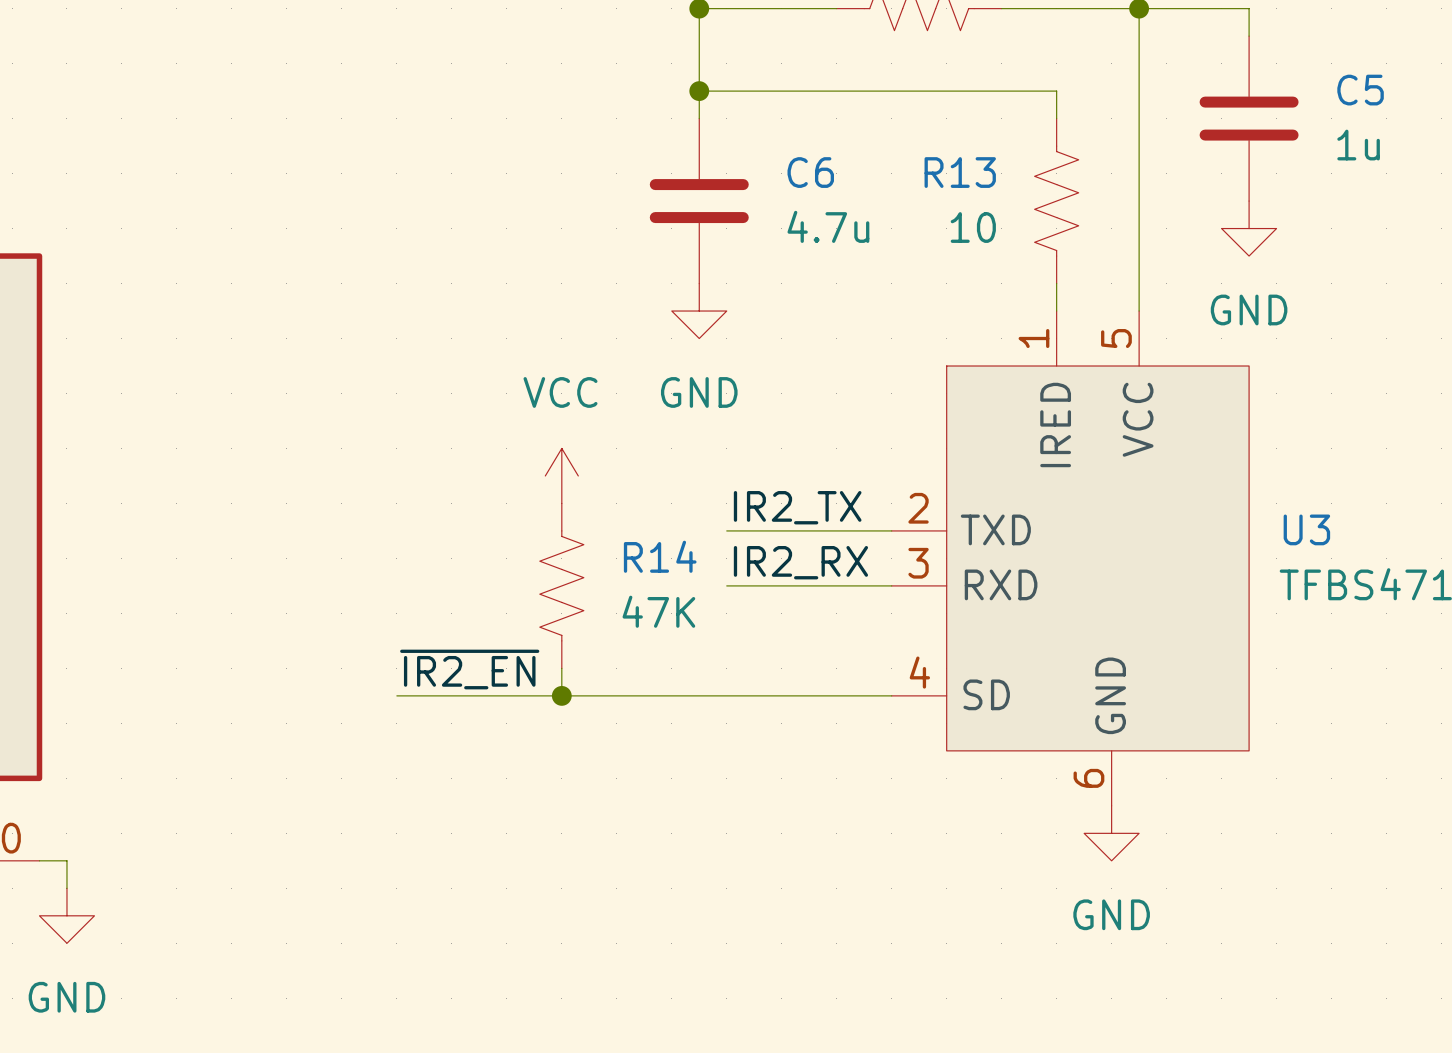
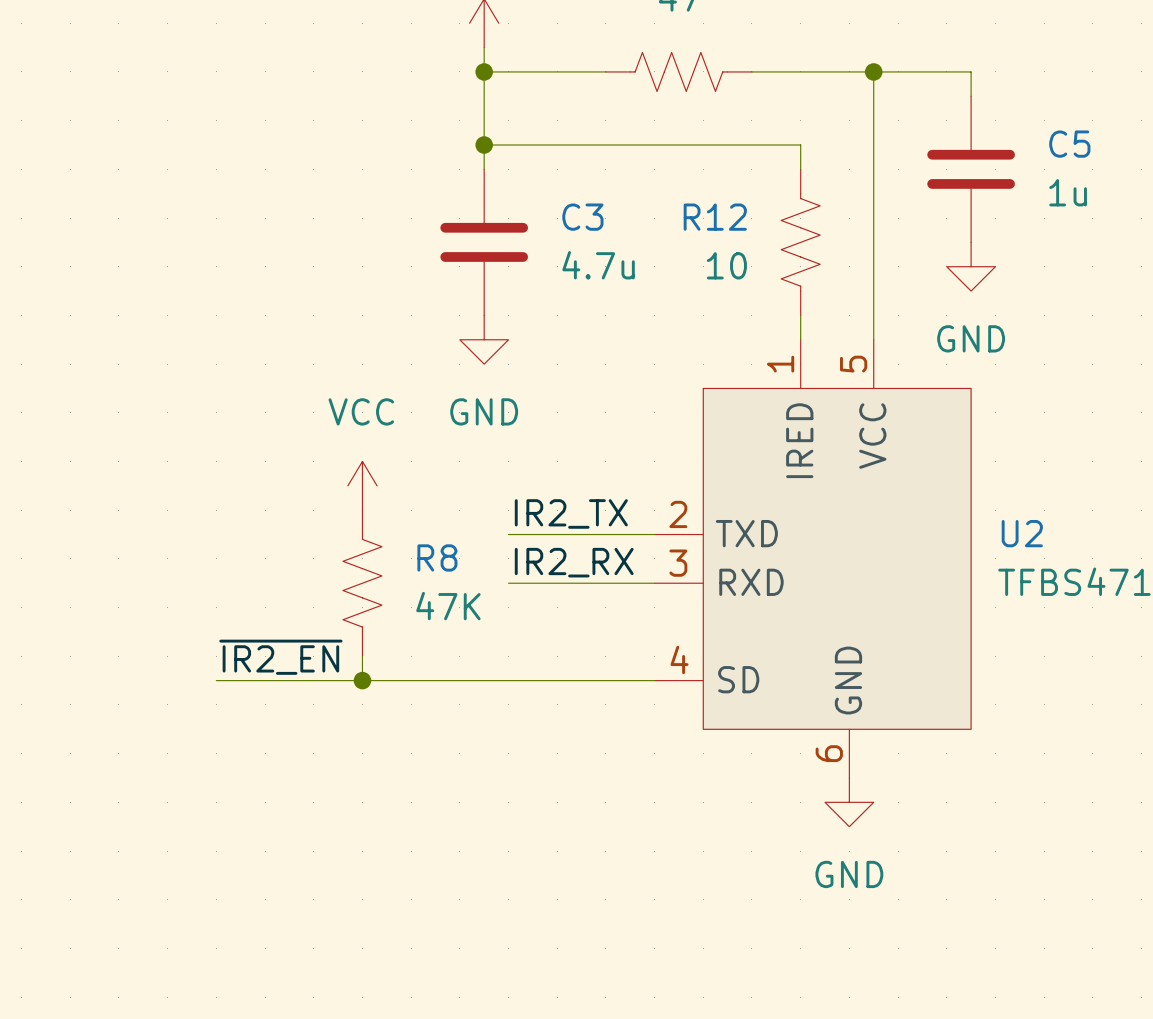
C6 name: C6 (810, 172) -> C3 (582, 217)
R13 name: R13 (960, 172) -> R12 (715, 217)
U3 name: U3 (1306, 529) -> U2 (1022, 533)
R14 name: R14 (660, 556) -> R8 (437, 557)

